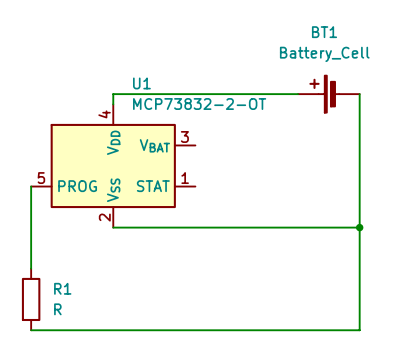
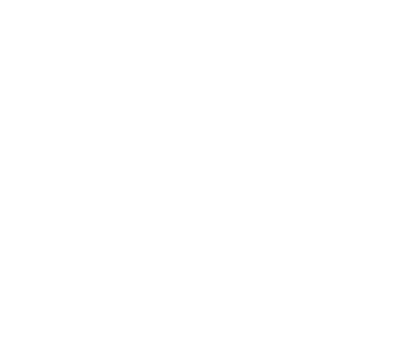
wire: (298, 94) (113, 94) (113, 104) -> none
BT1: Battery_Cell (328, 94) -> none
wire: (359, 94) (359, 330) (31, 330) -> none
U1: MCP73832-2-OT (113, 165) -> none
wire: (31, 186) (31, 268) -> none
wire: (113, 227) (359, 227) -> none
junction: (359, 227) -> none
R1: R (31, 299) -> none

